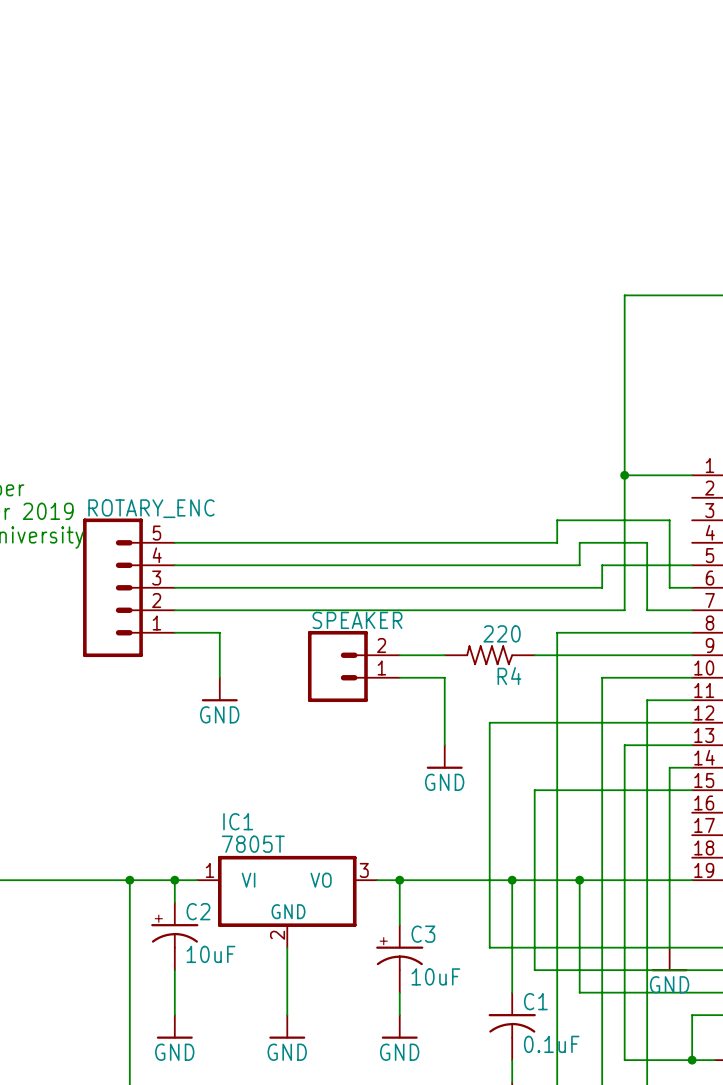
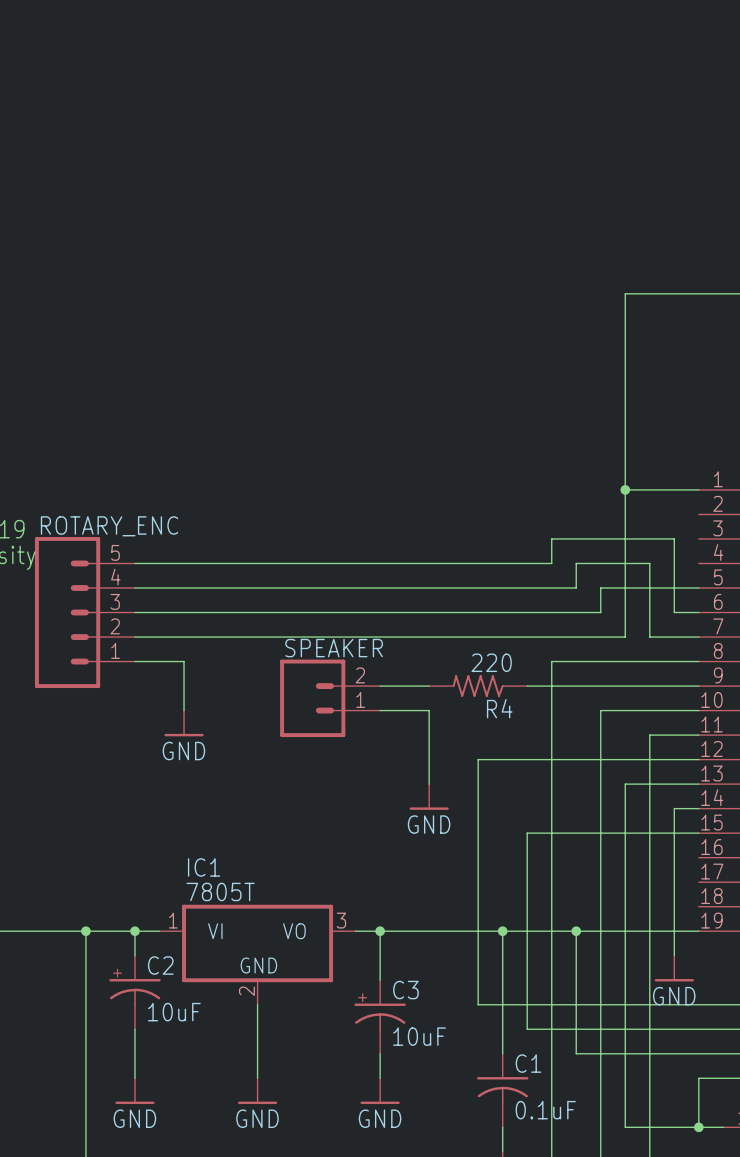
power symbol position: GND (669, 959) -> GND (674, 968)

